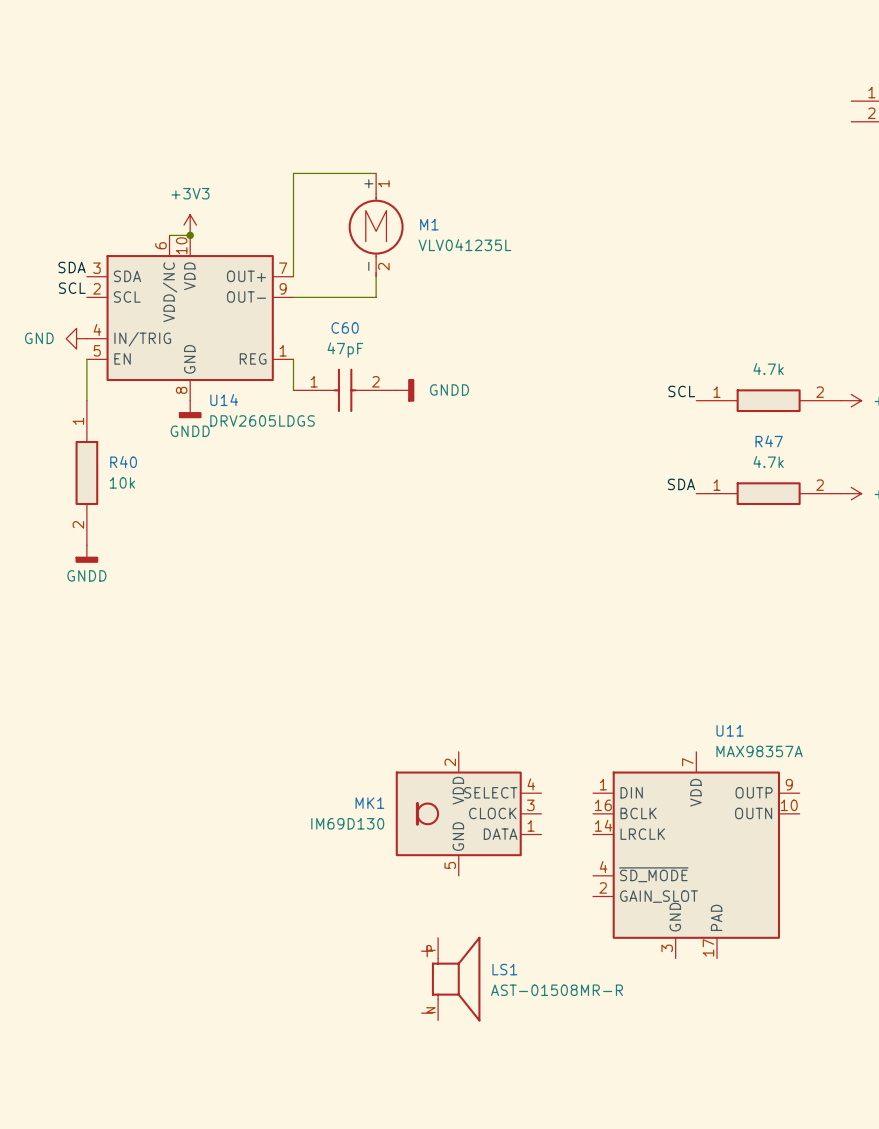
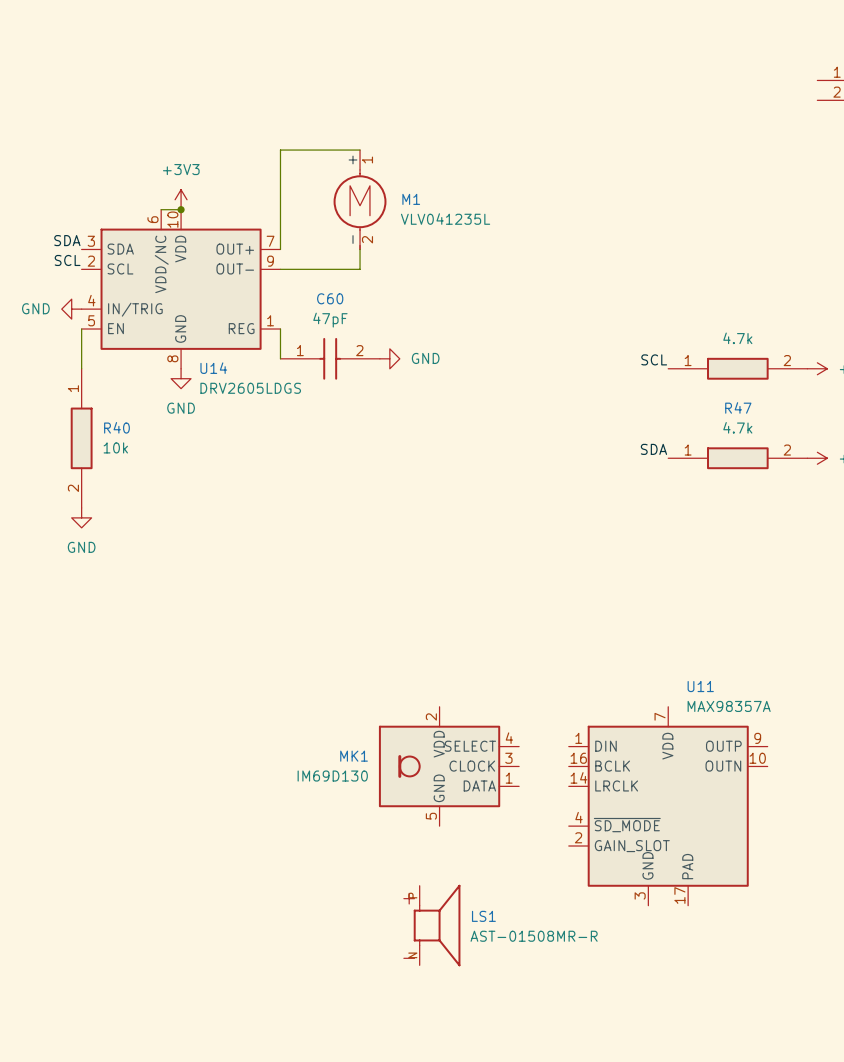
power symbol: GNDD (405, 390) -> GND (389, 358)
power symbol: GNDD (190, 409) -> GND (181, 378)
power symbol: GNDD (86, 554) -> GND (81, 517)

